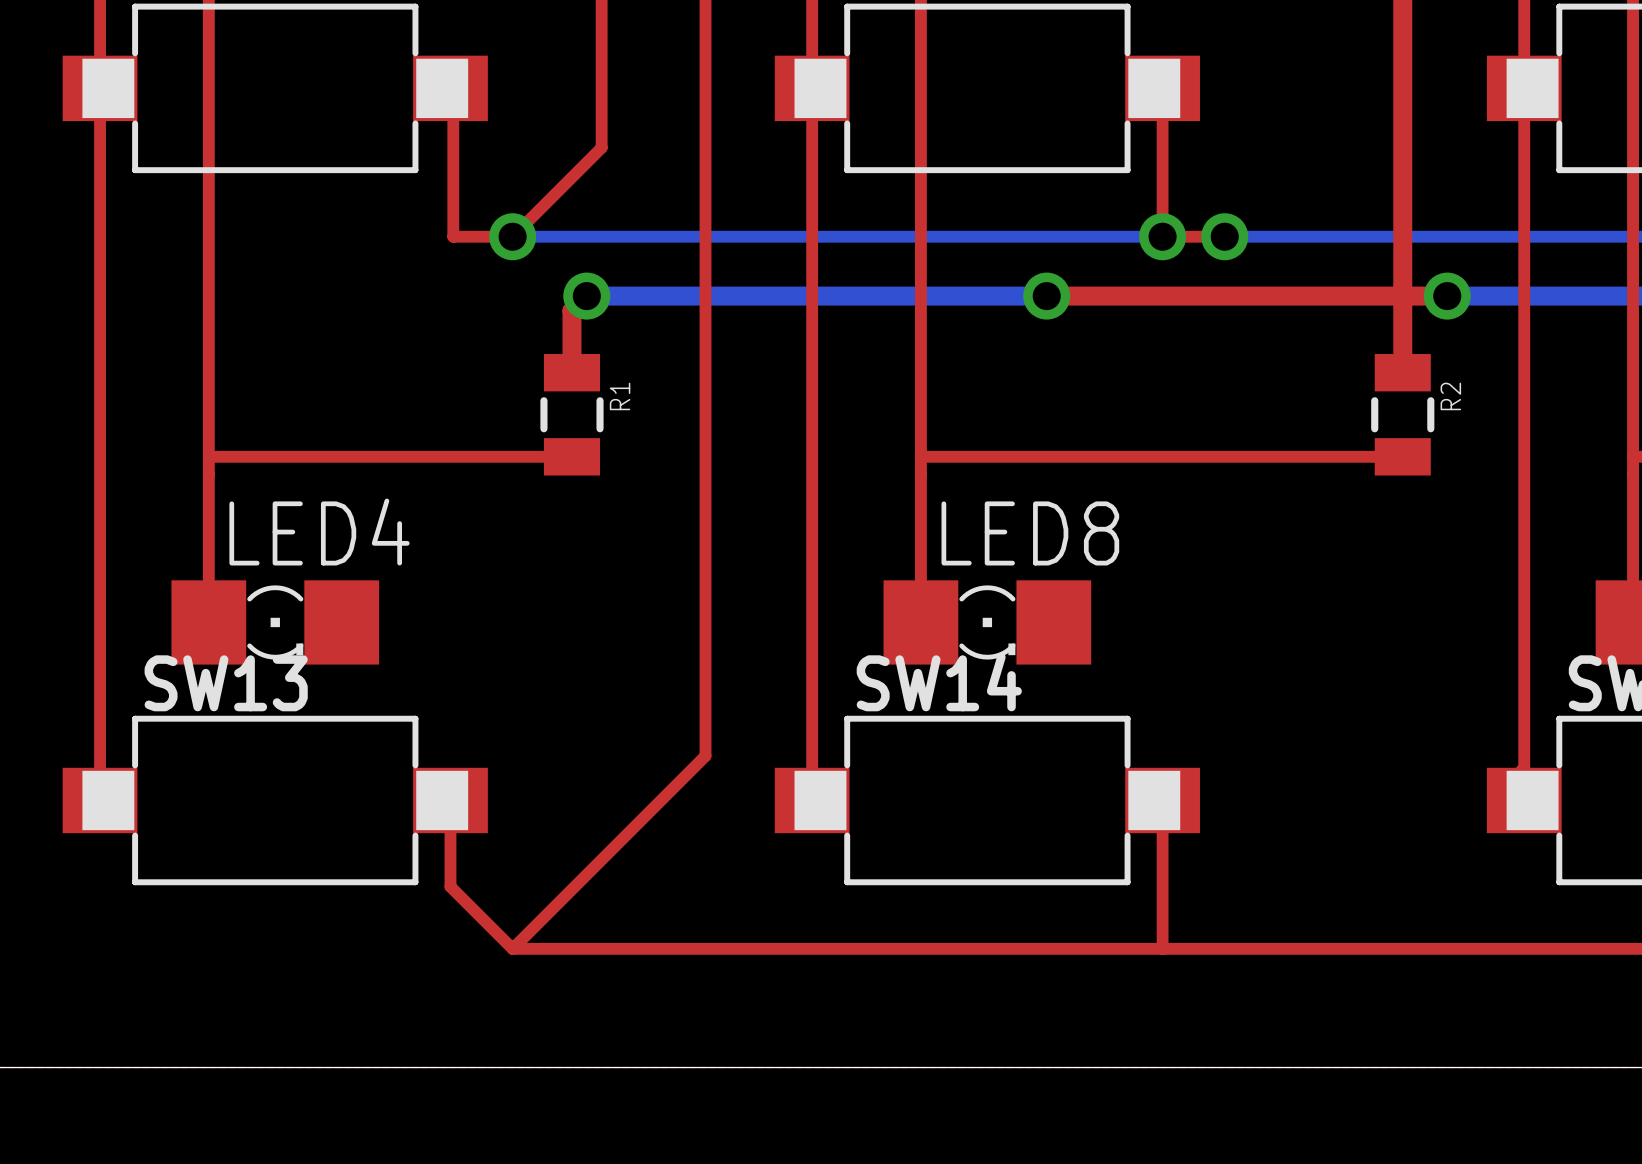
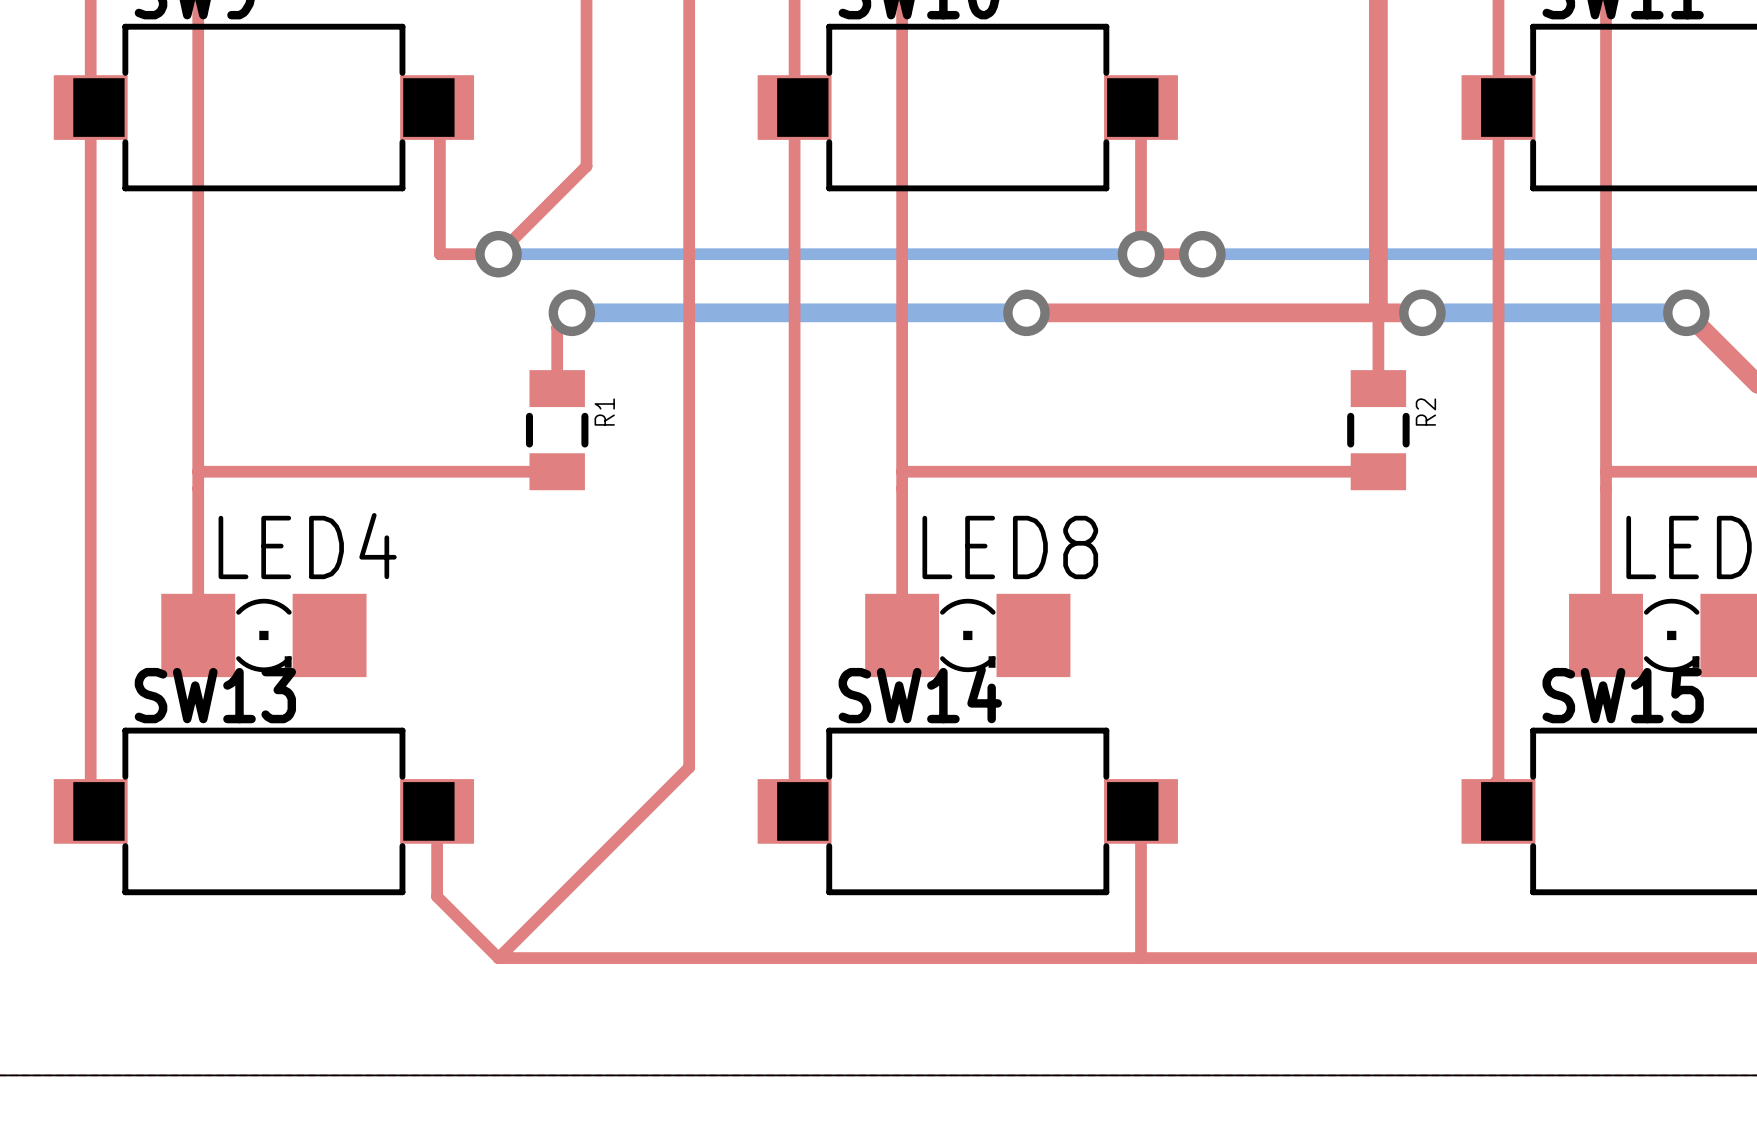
top track width: thick (586, 296) (571, 310) (571, 372) -> thin (571, 312) (557, 327) (557, 388)
top track width: thick (1402, 296) (1402, 372) -> thin (1378, 312) (1378, 388)

